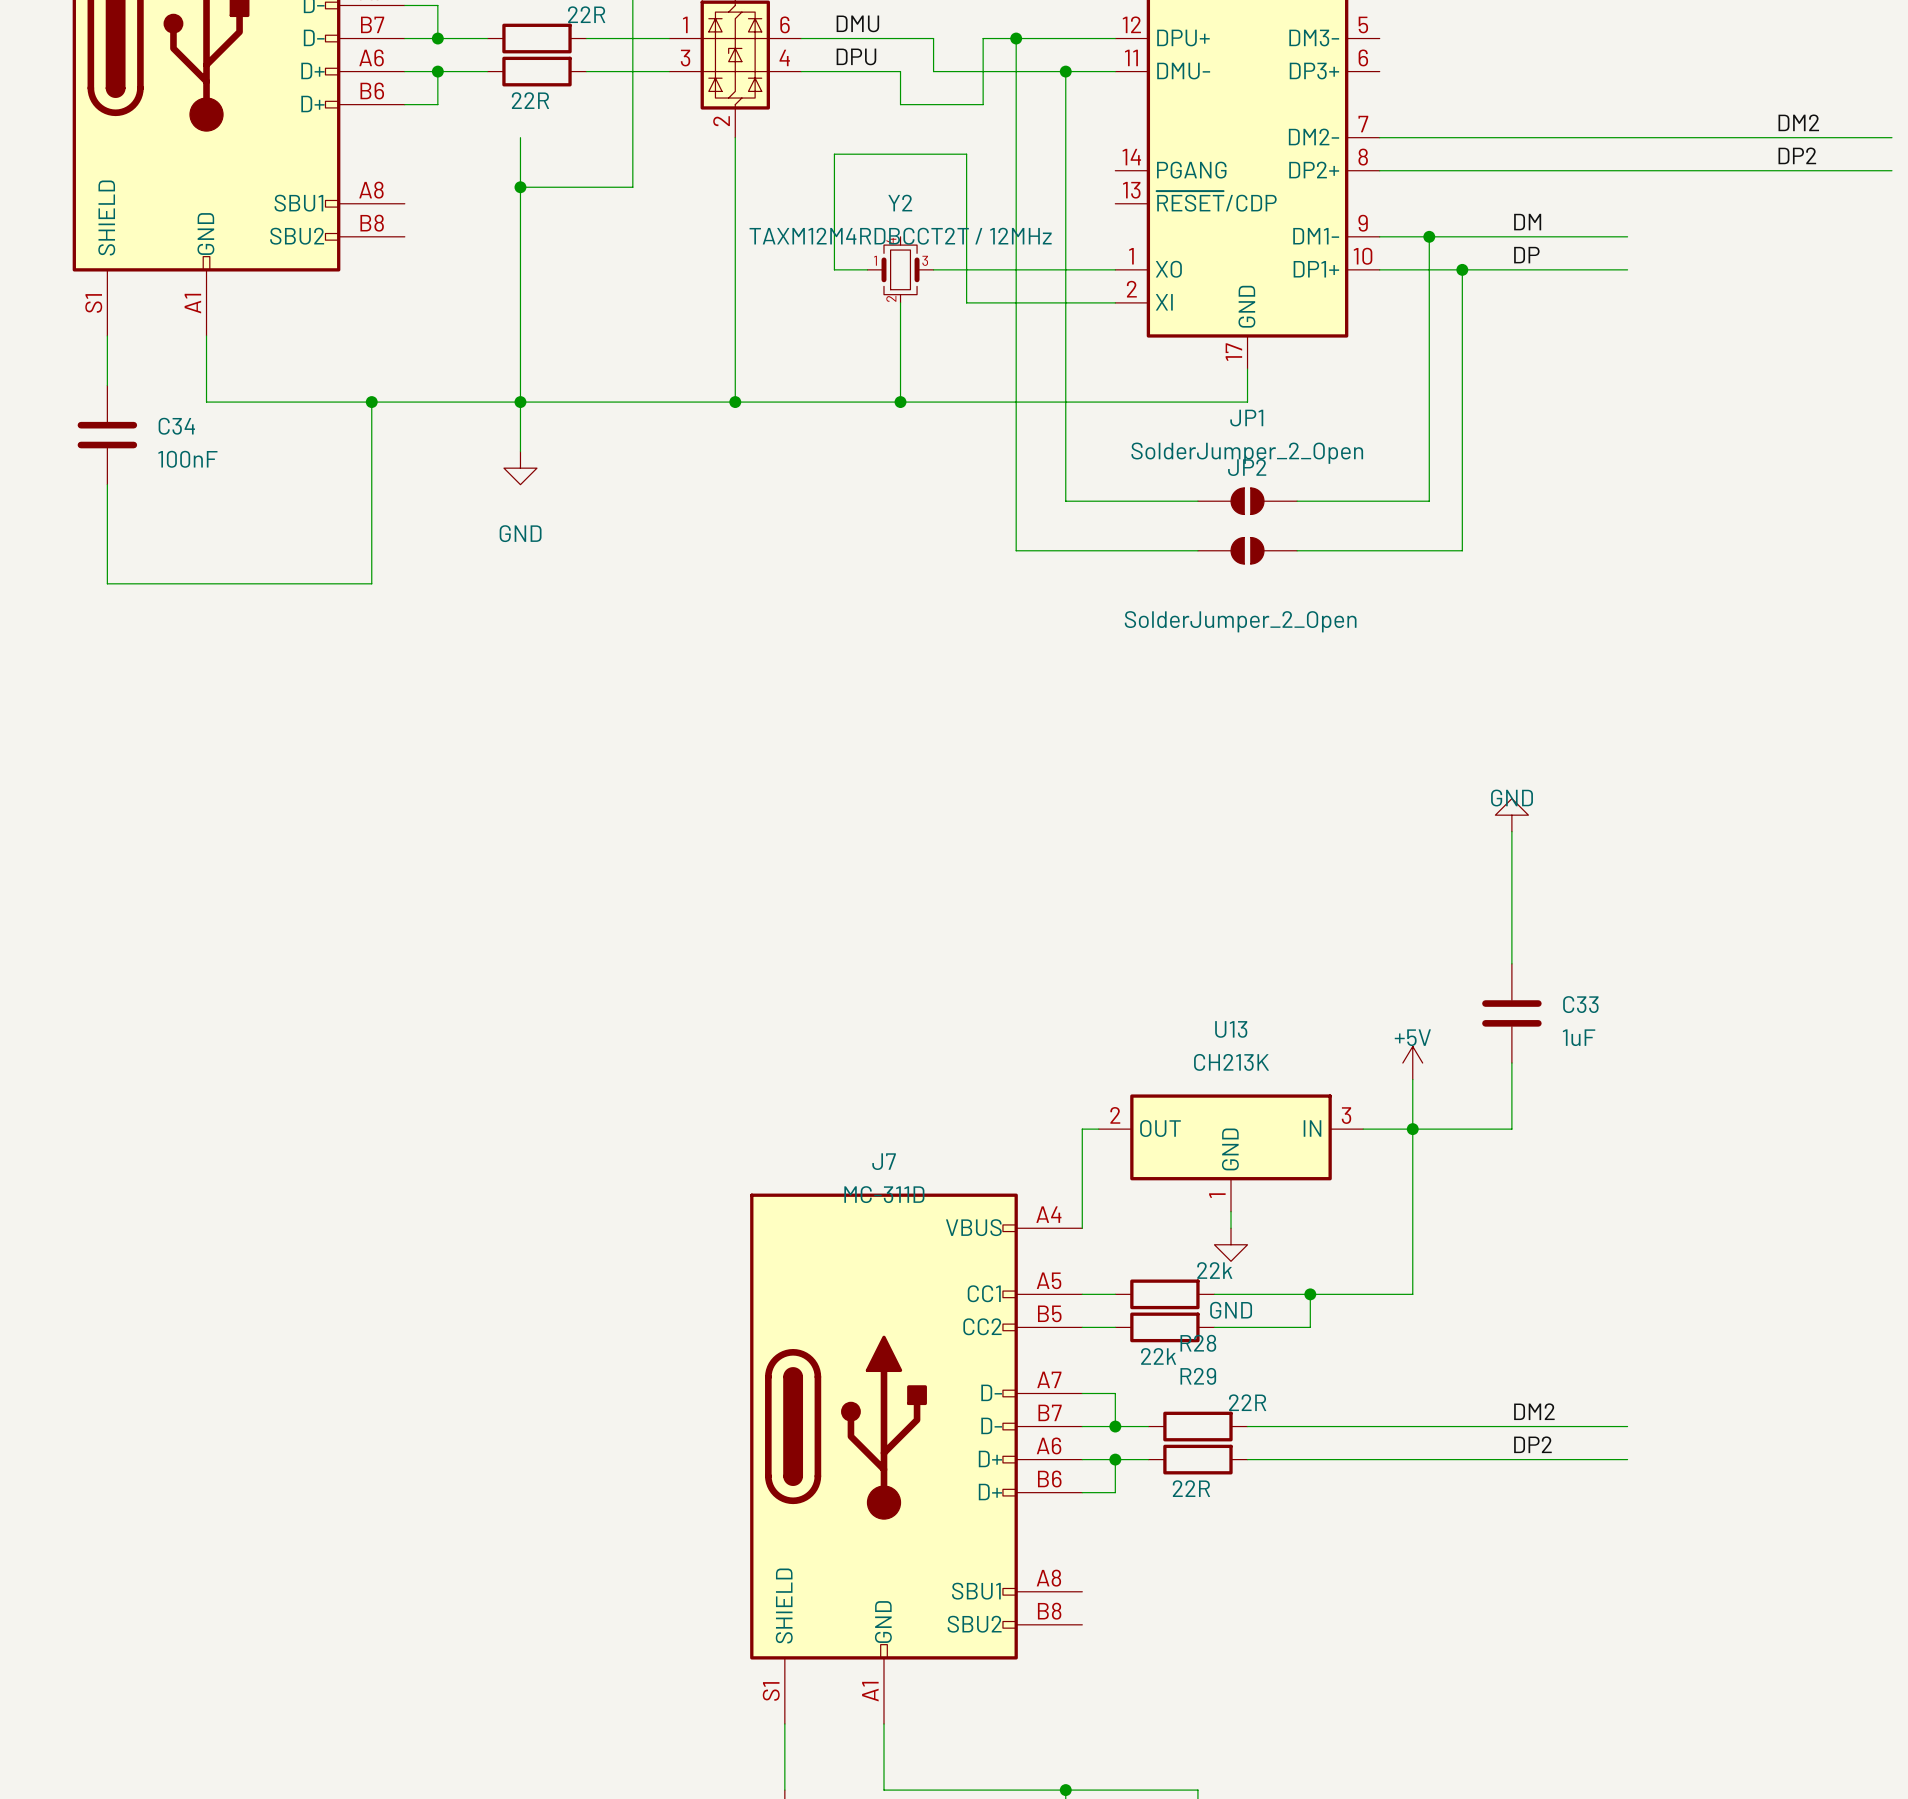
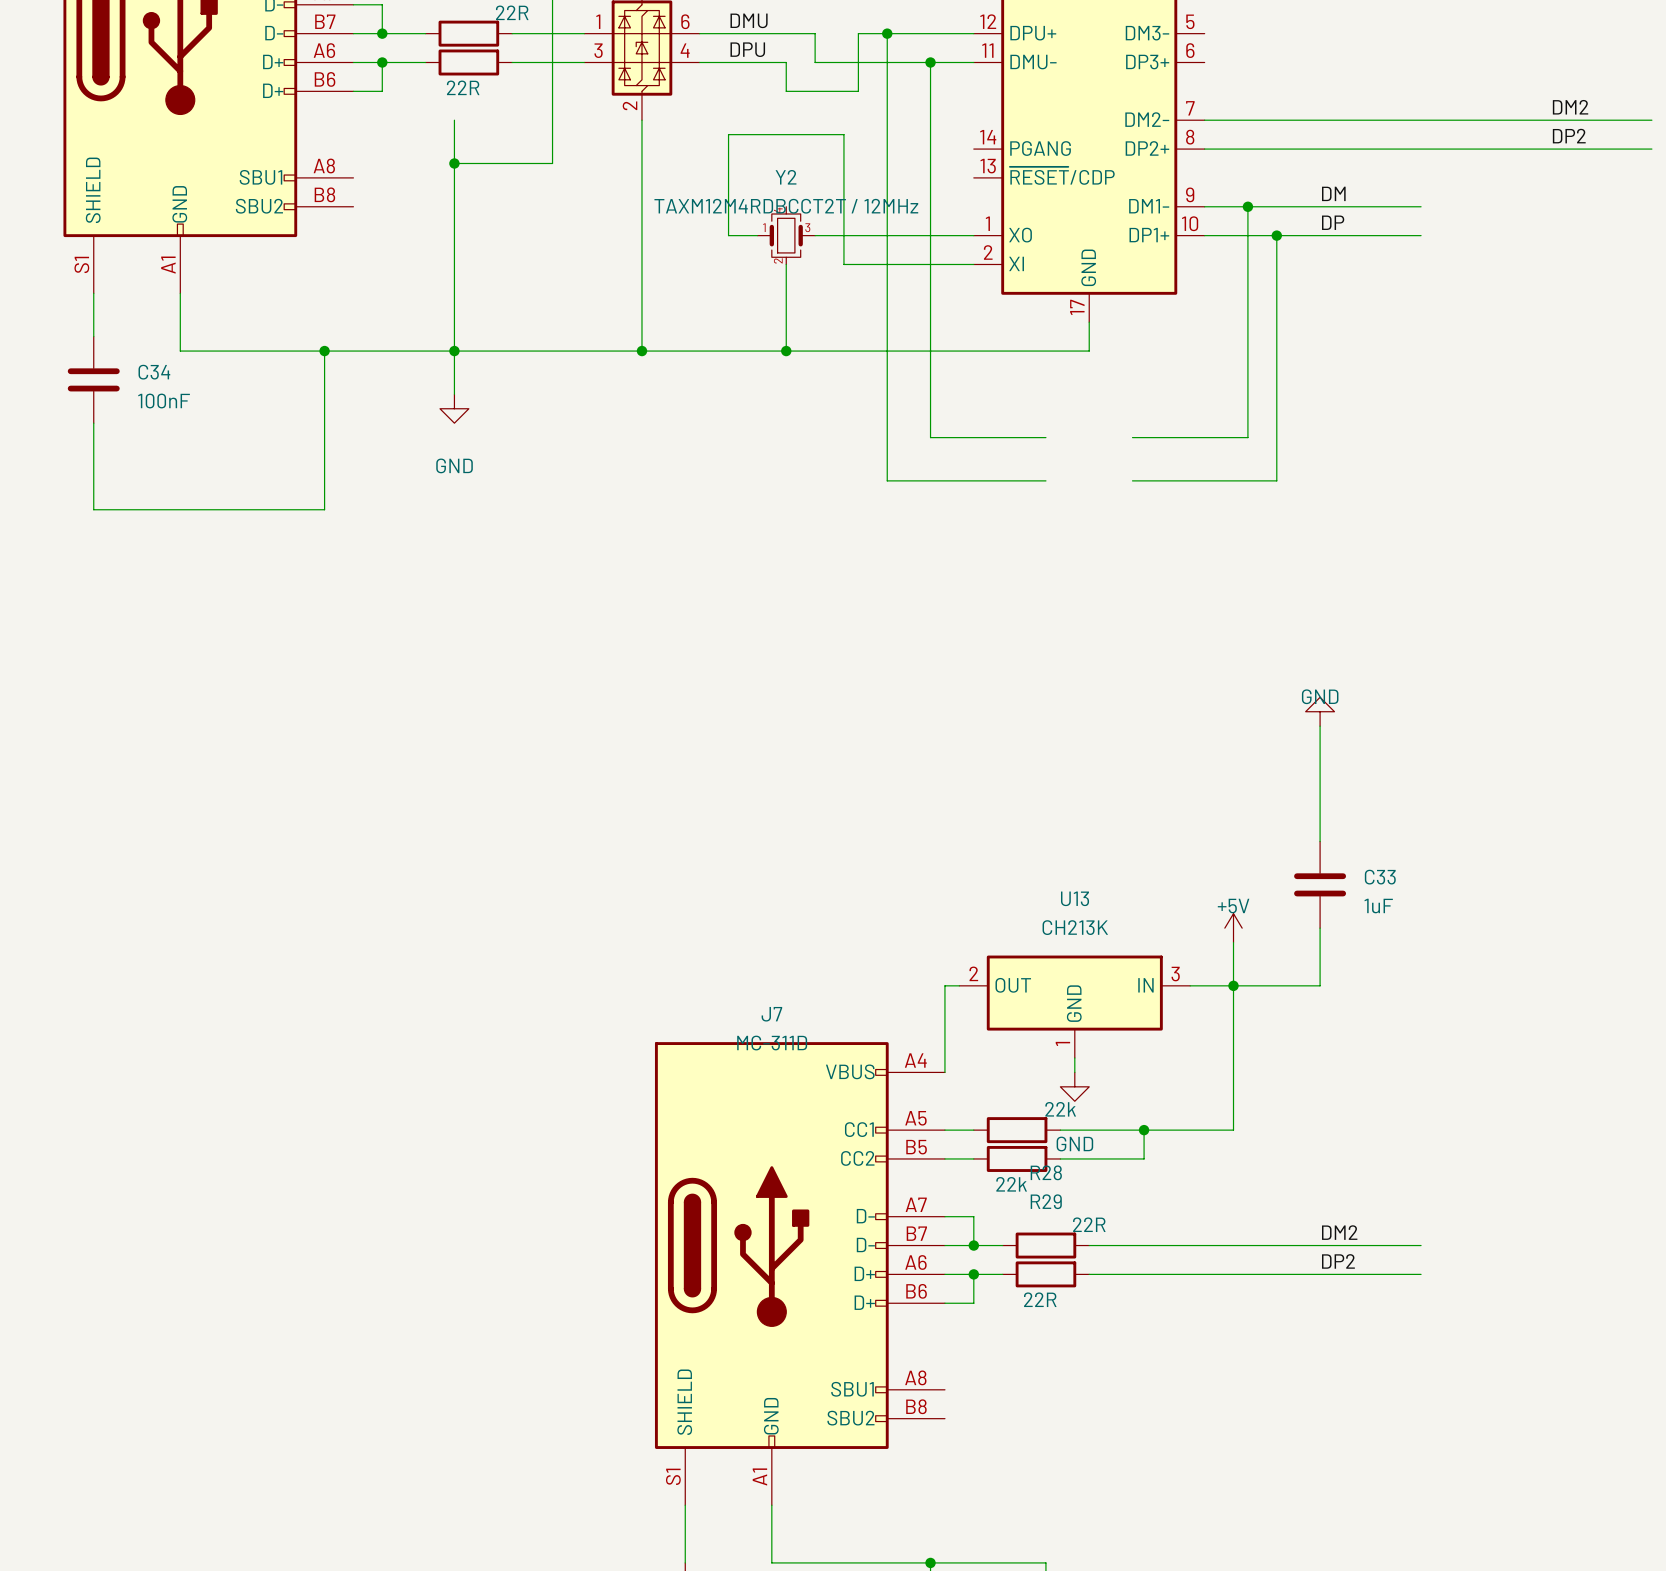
JP1: SolderJumper_2_Open (1247, 501) -> none
JP2: SolderJumper_2_Open (1247, 550) -> none

